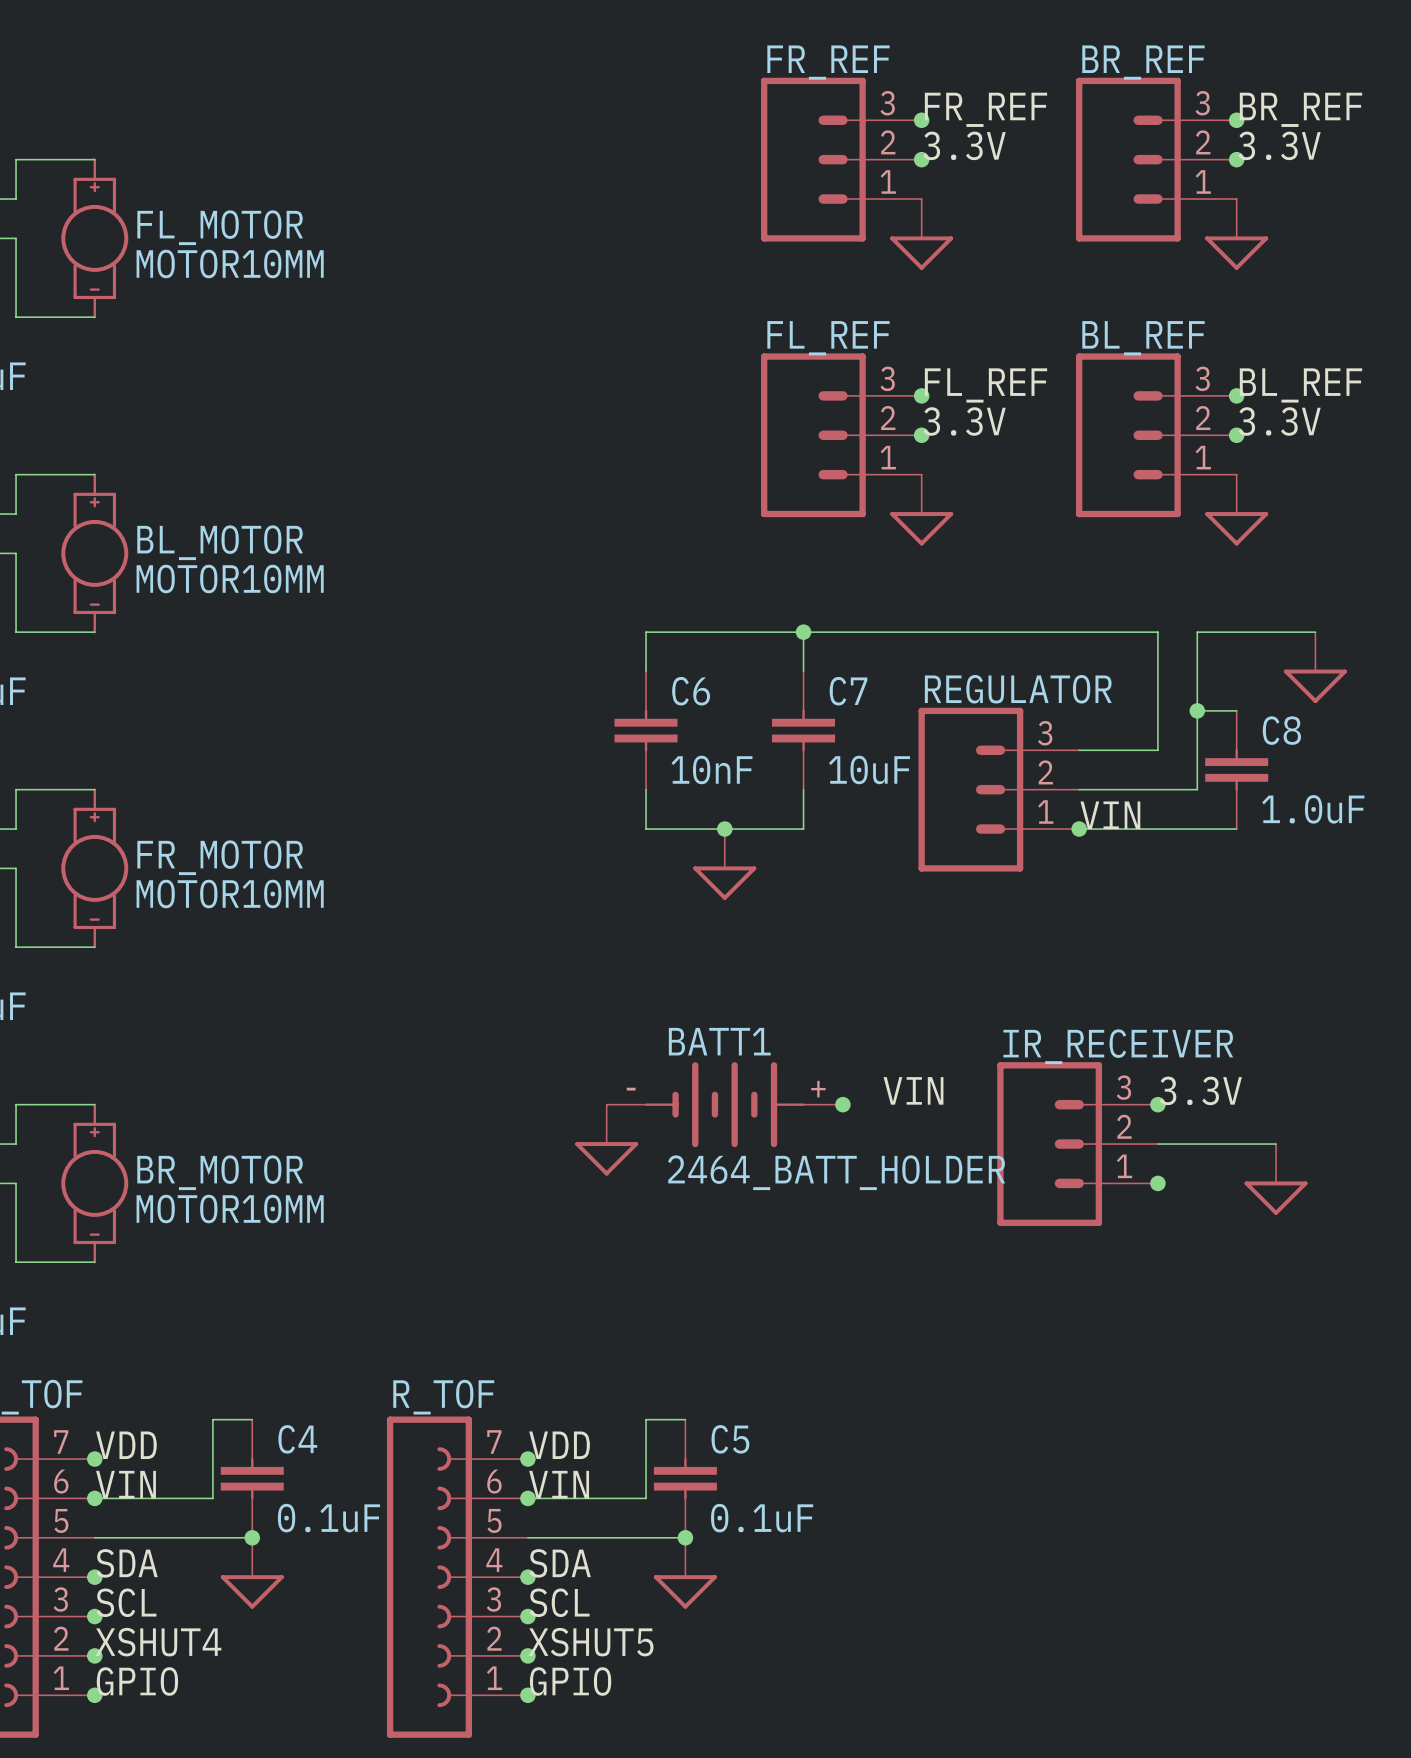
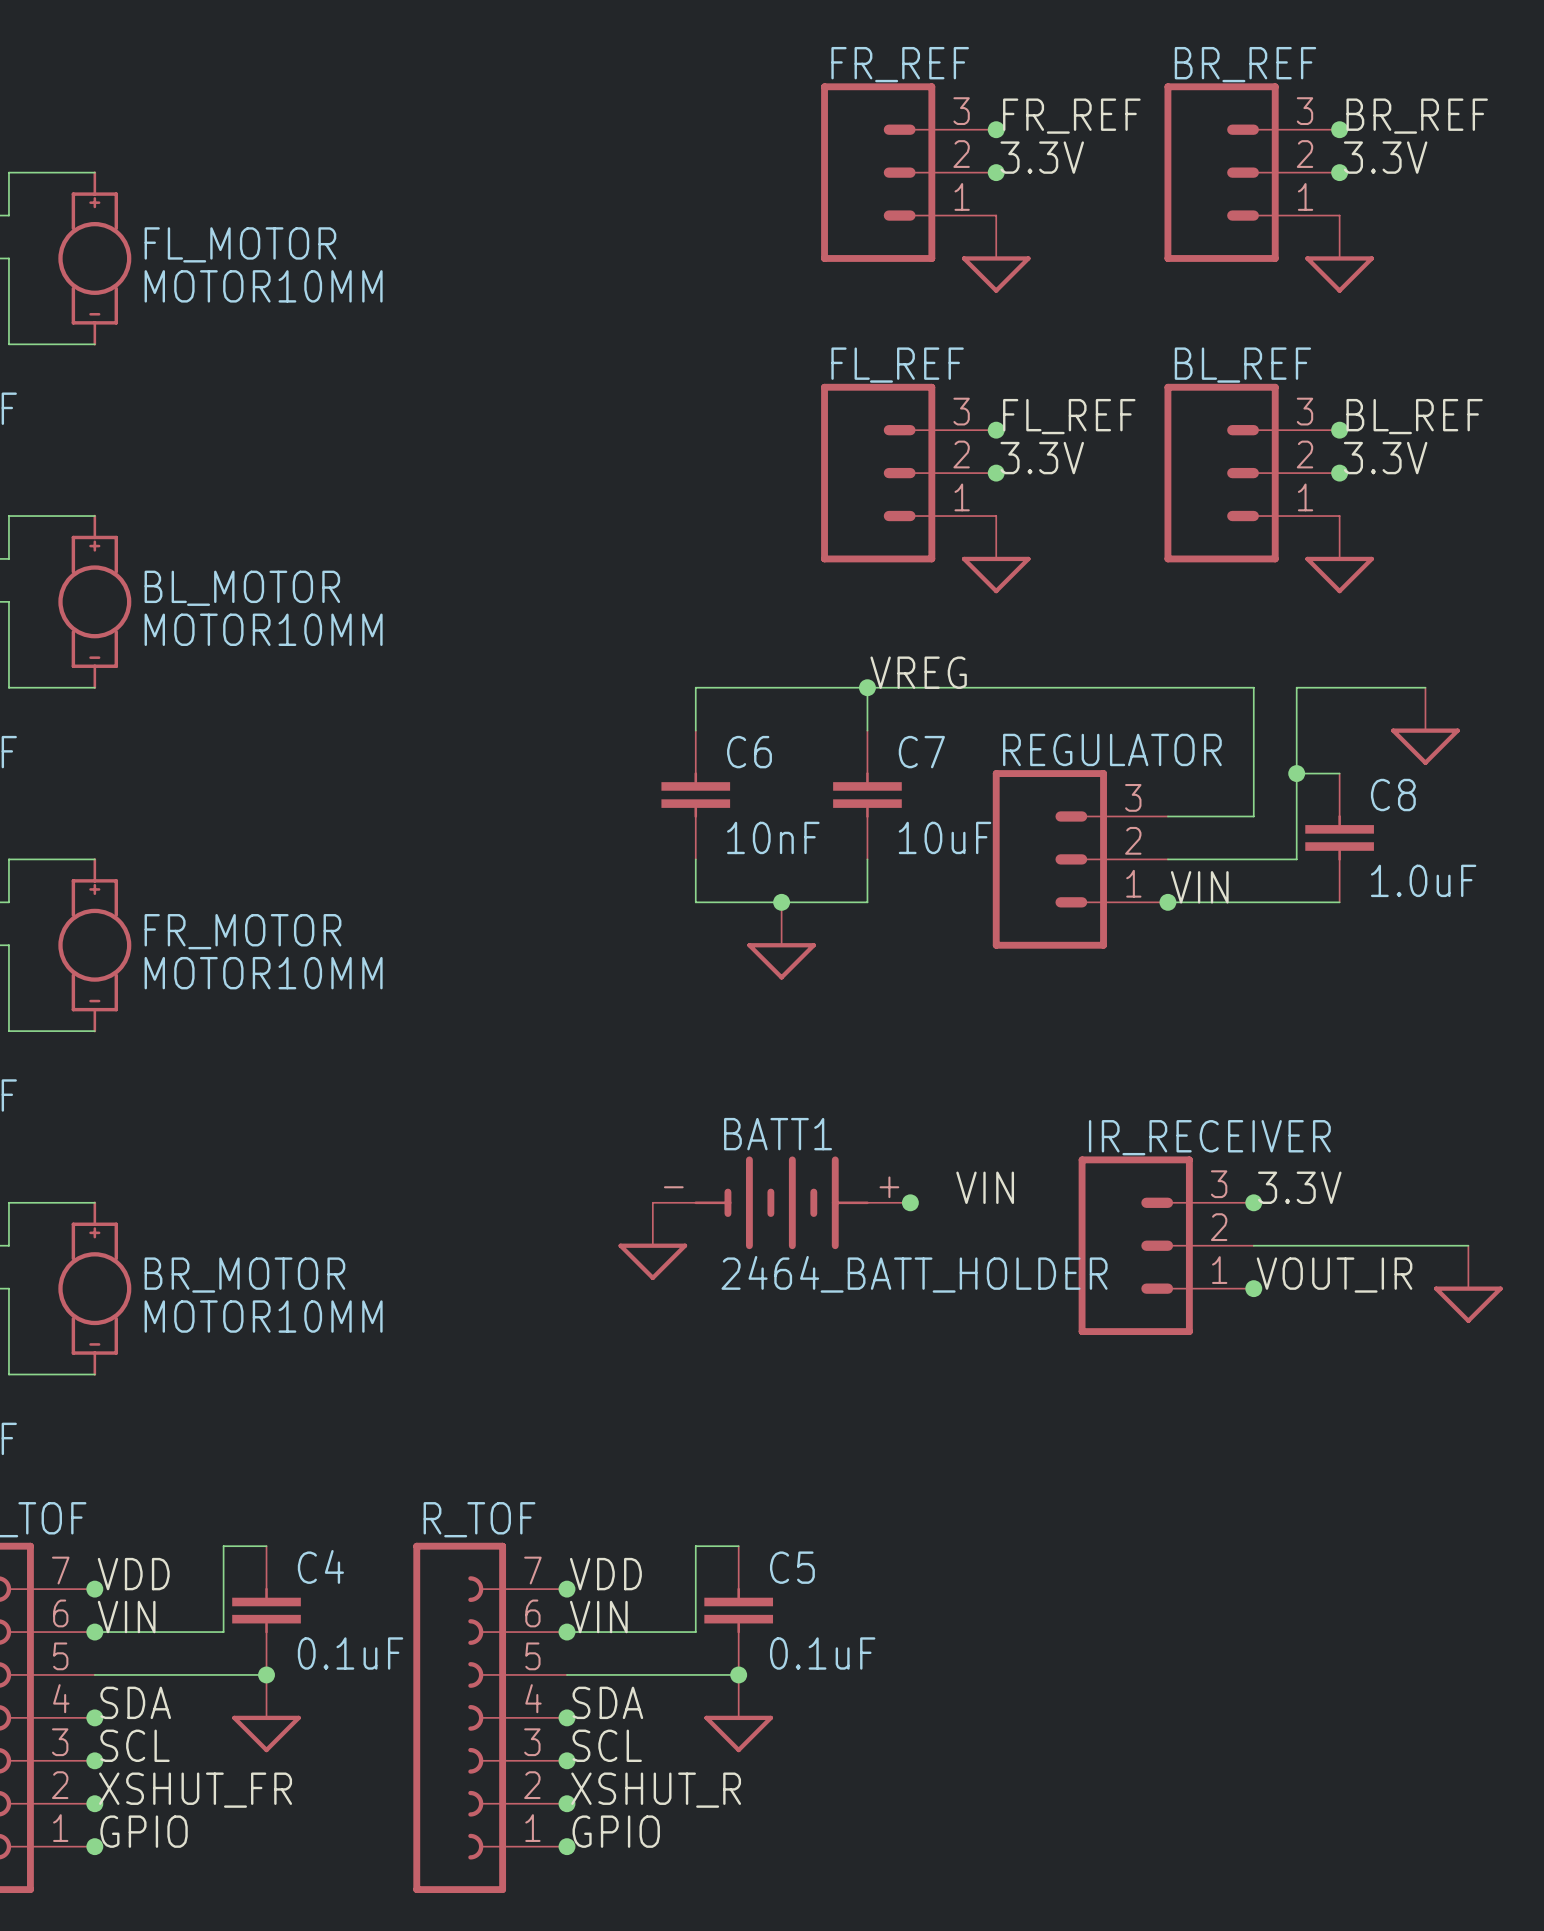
label: none -> VREG (918, 672)
wire: none -> (1382, 1245) (1468, 1245)
label: none -> VOUT_IR (1334, 1275)
power symbol position: (1276, 1179) -> (1468, 1284)
label: XSHUT4 (158, 1642) -> XSHUT_FR (195, 1790)
label: XSHUT5 (591, 1642) -> XSHUT_R (656, 1790)

